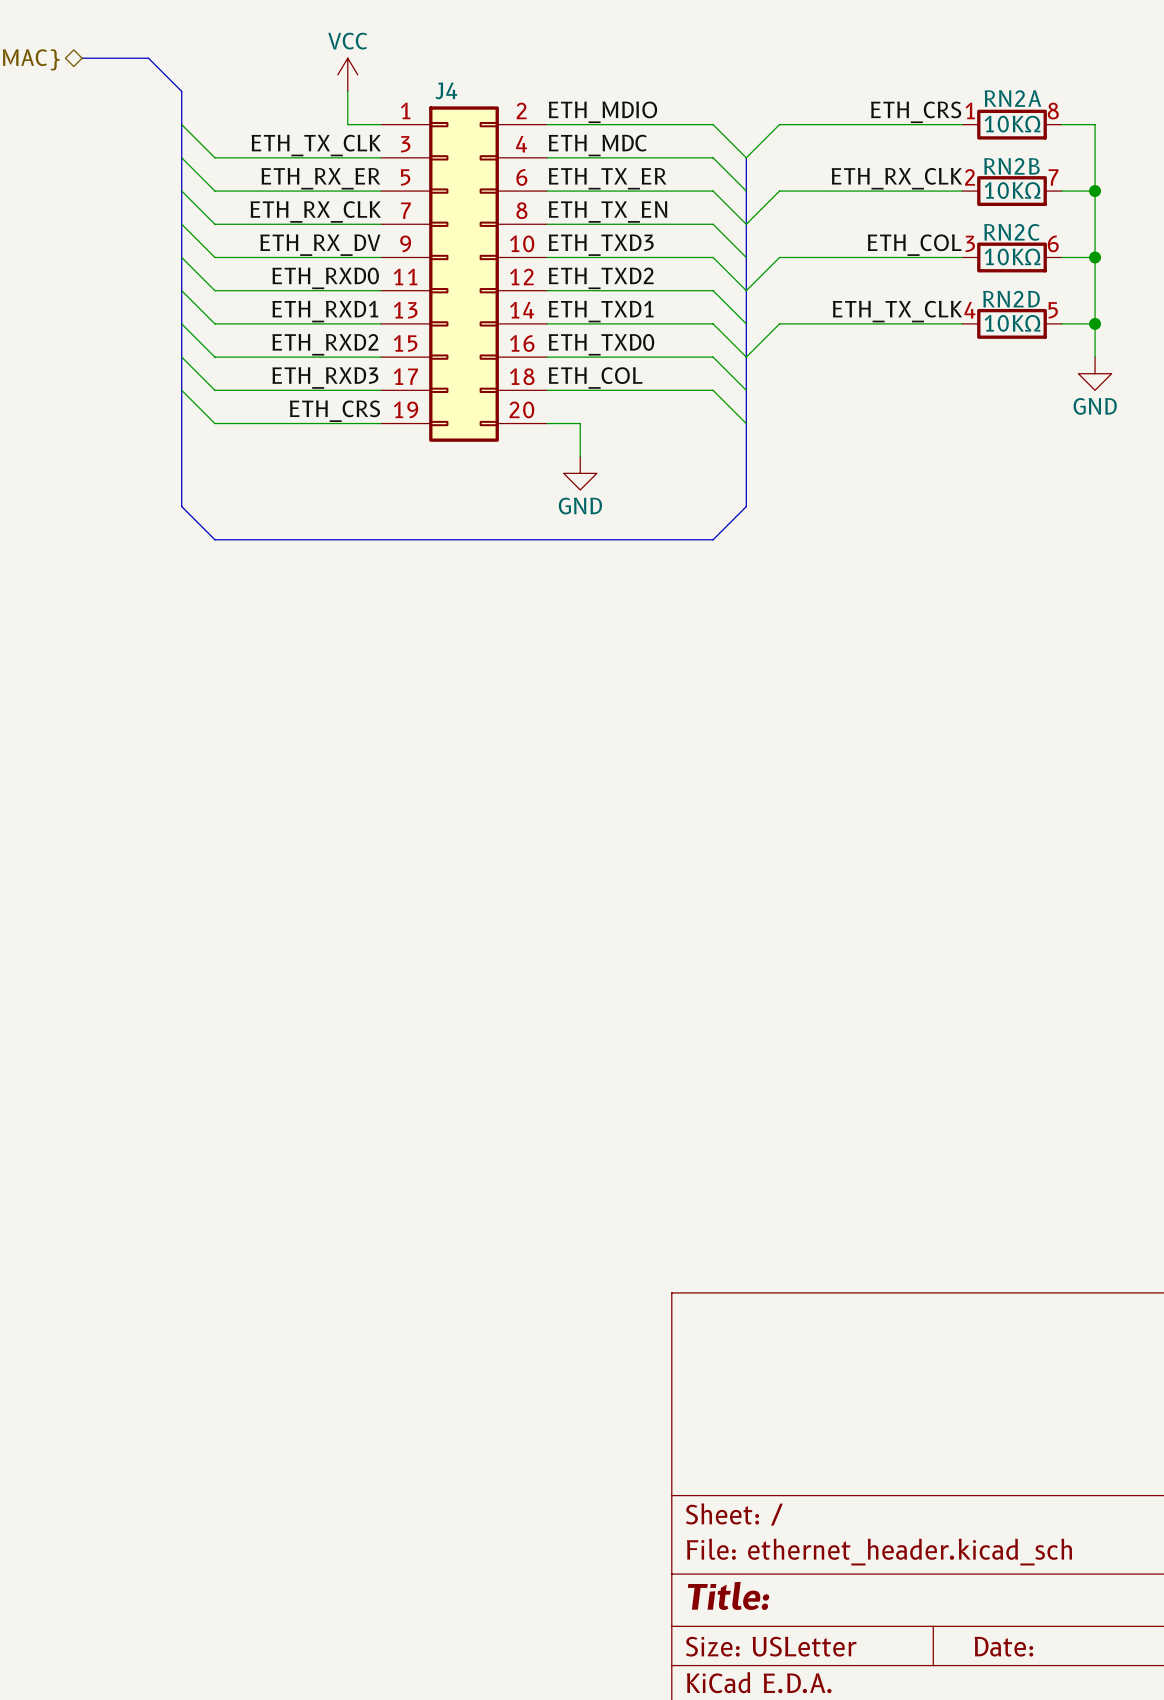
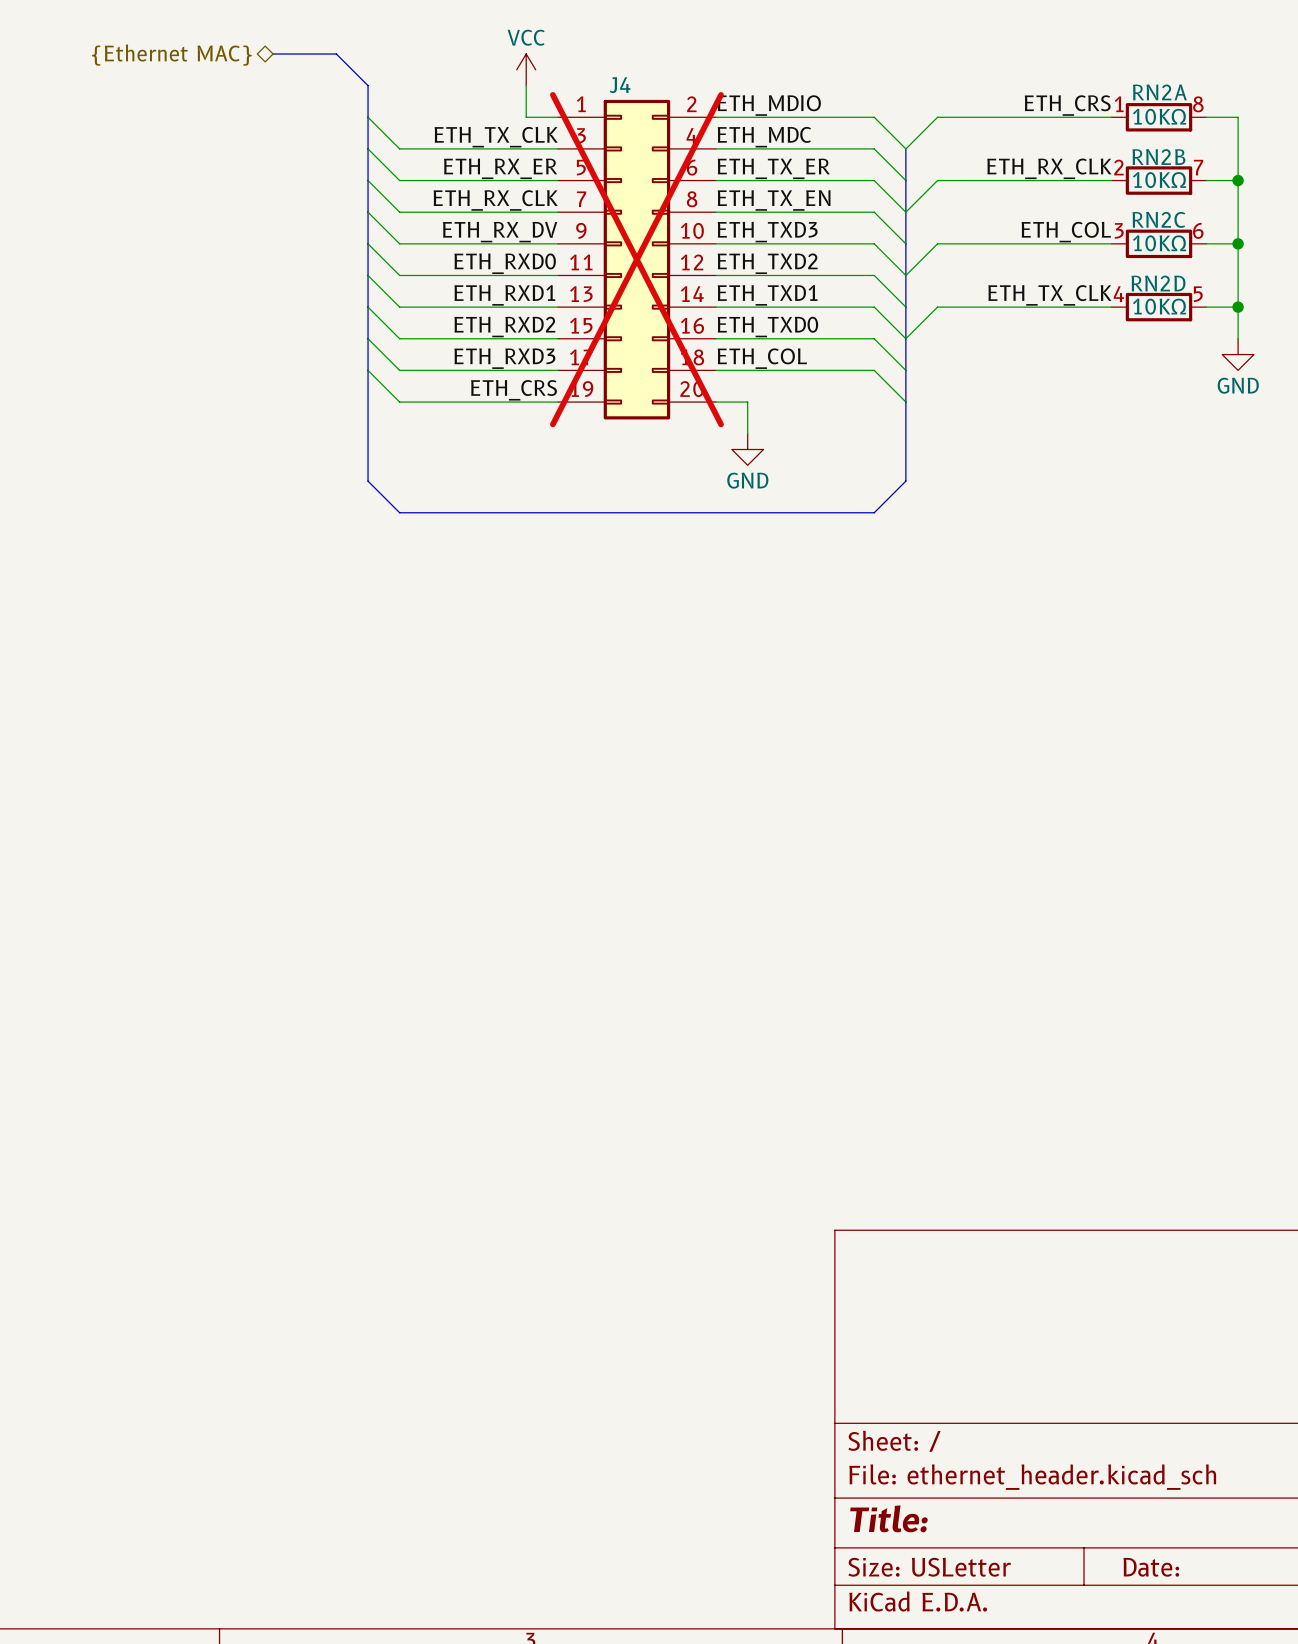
J4 do-not-place cross: none -> (636, 259)

